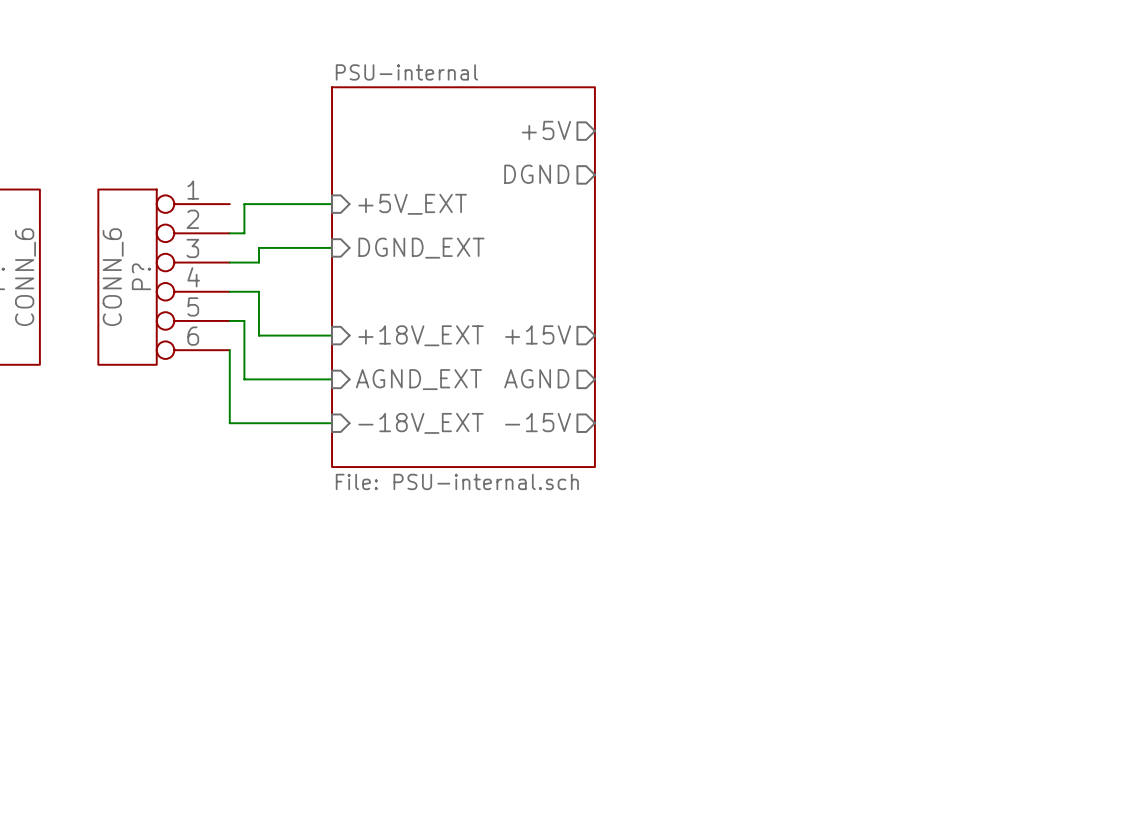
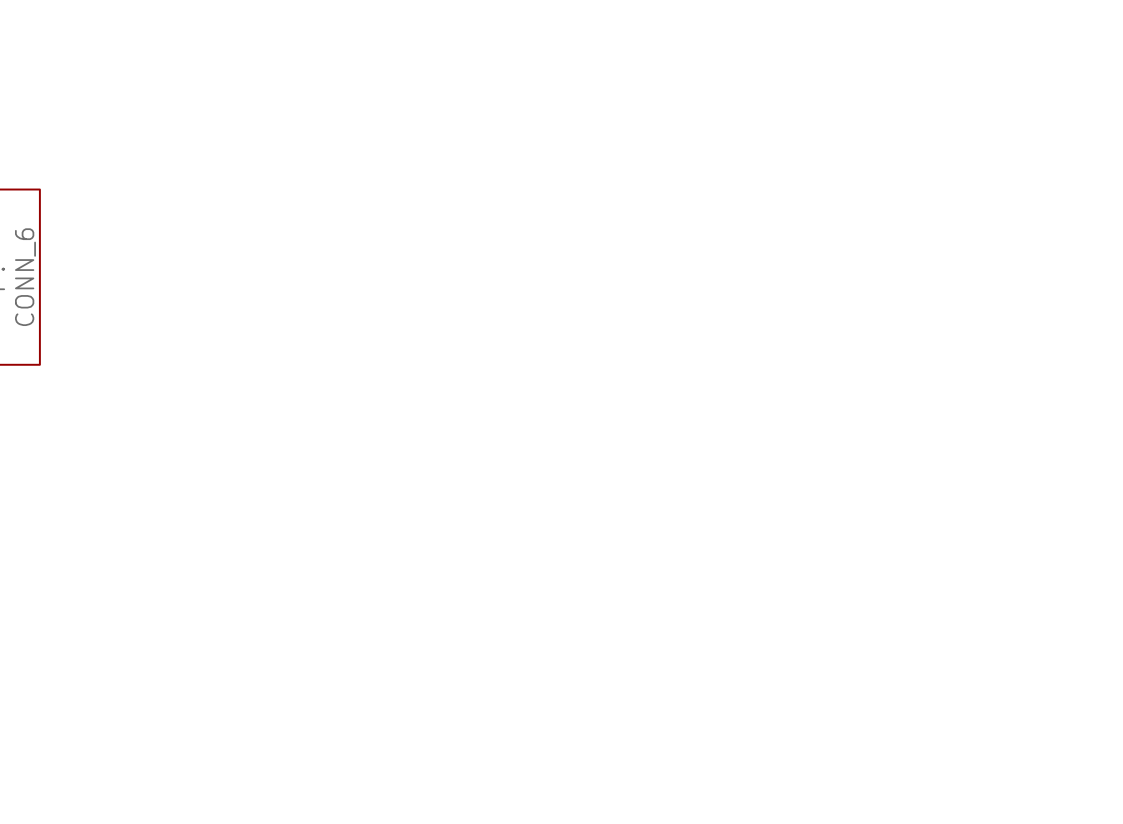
sheet pin: +5V (546, 130) -> none
sheet pin: DGND (536, 174) -> none
wire: (332, 204) (244, 204) (244, 233) (229, 233) -> none
sheet pin: +5V_EXT (412, 204) -> none
wire: (332, 247) (259, 247) (259, 262) (229, 262) -> none
sheet pin: DGND_EXT (421, 248) -> none
P?: CONN_6 (164, 277) -> none
sheet PSU-internal: File: PSU-internal.sch (463, 277) -> none
wire: (229, 291) (259, 291) (259, 335) (332, 335) -> none
wire: (229, 320) (244, 320) (244, 379) (332, 379) -> none
sheet pin: +15V (538, 334) -> none
sheet pin: +18V_EXT (421, 335) -> none
wire: (229, 350) (229, 423) (332, 423) -> none
sheet pin: AGND (536, 378) -> none
sheet pin: AGND_EXT (418, 379) -> none
sheet pin: -15V (538, 422) -> none
sheet pin: -18V_EXT (421, 423) -> none

